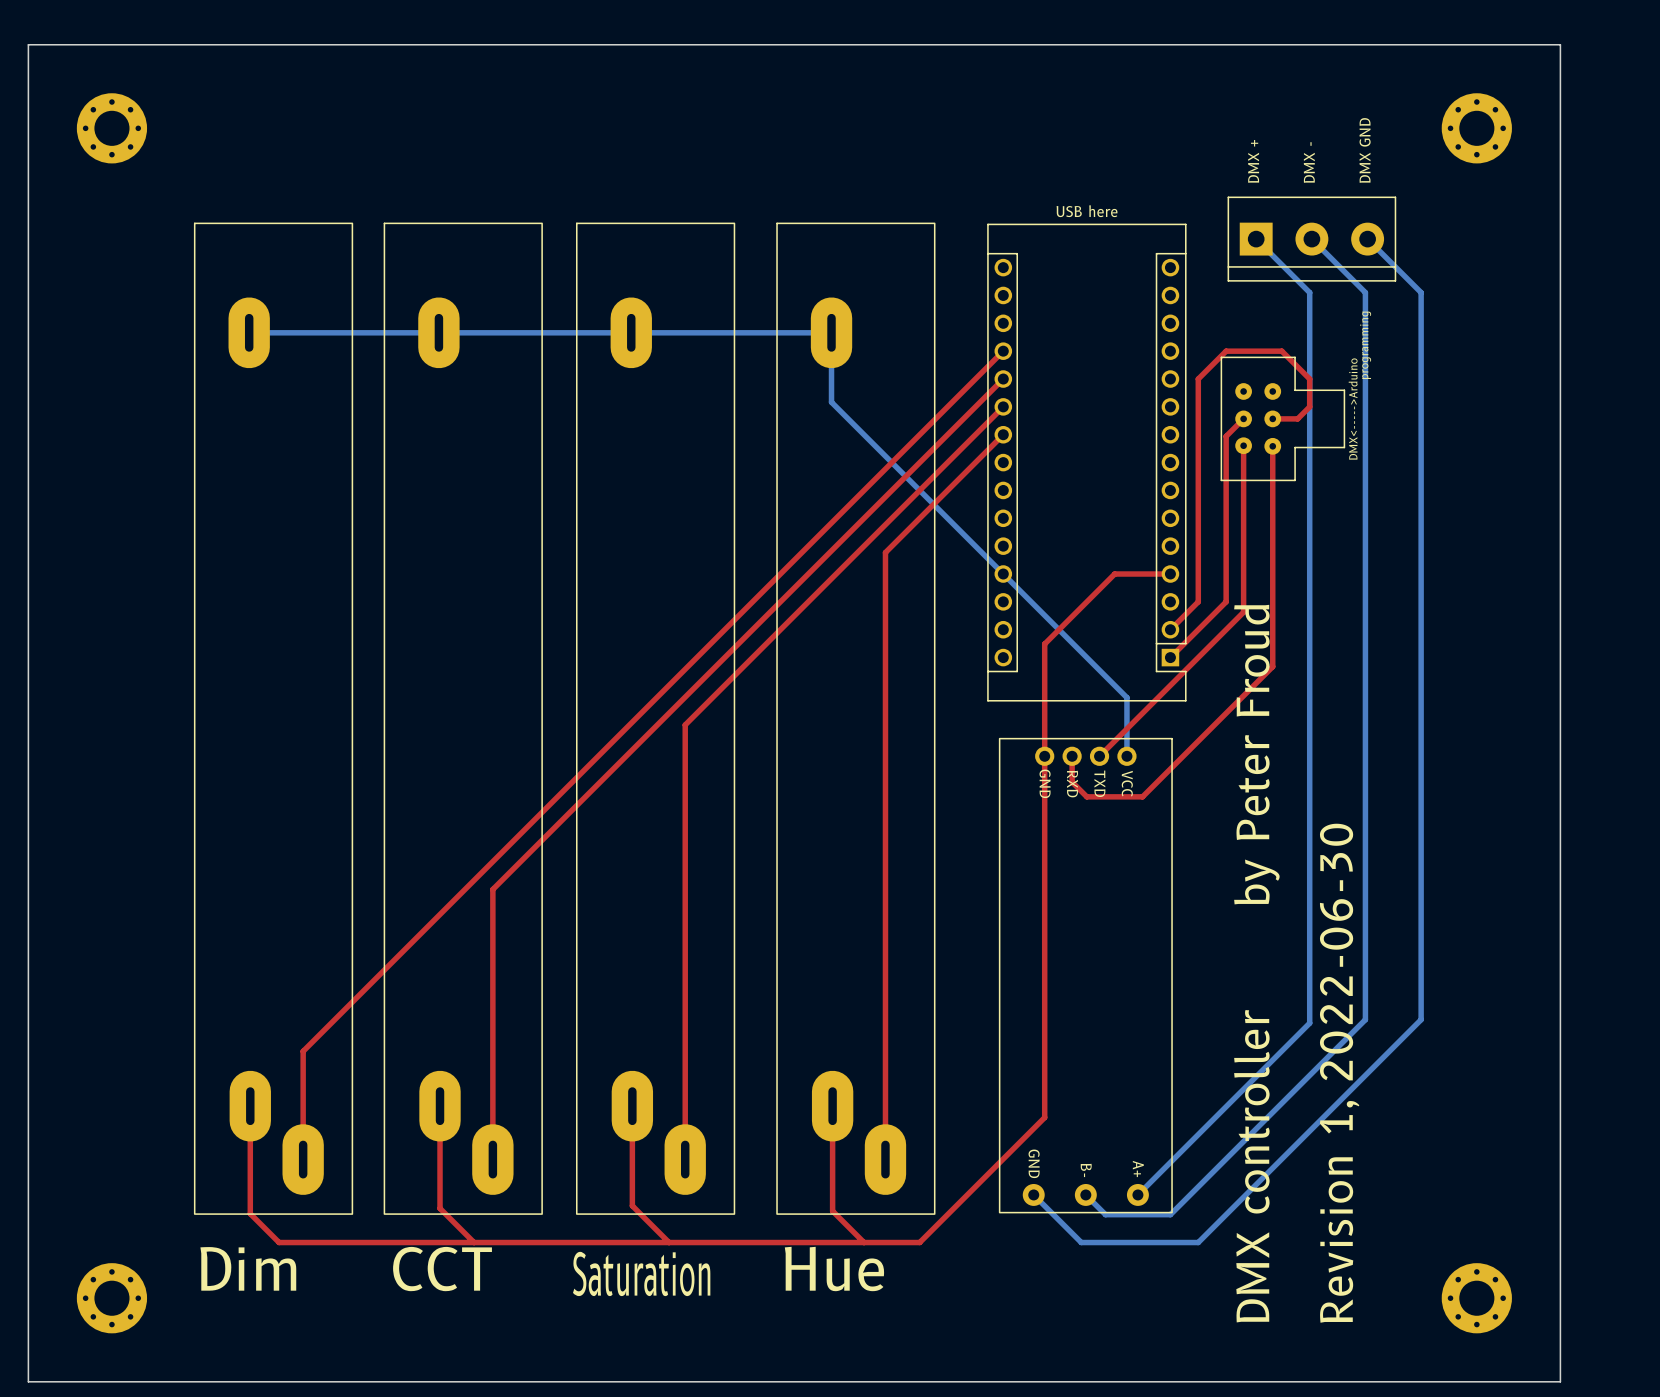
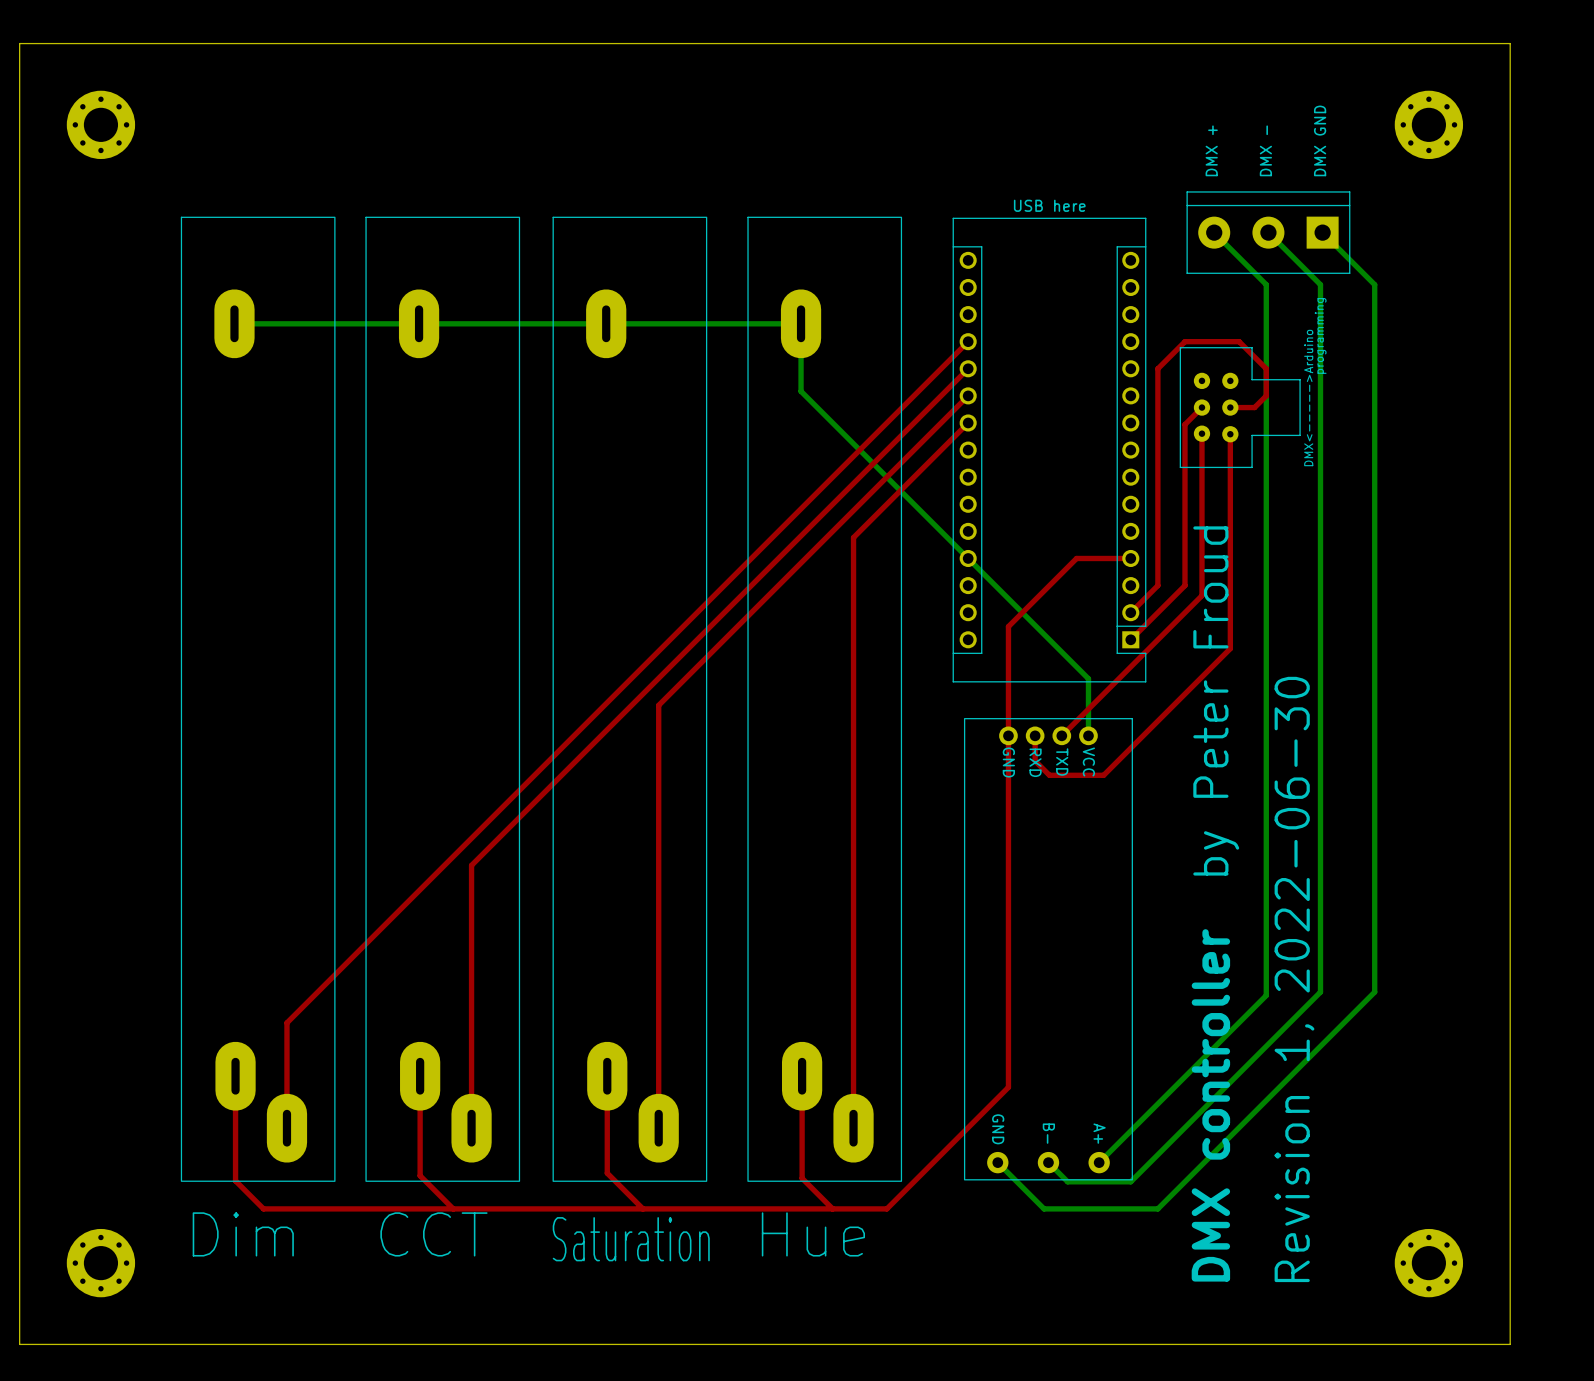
part rotation: 0° (1311, 239) -> 180° (1268, 232)

